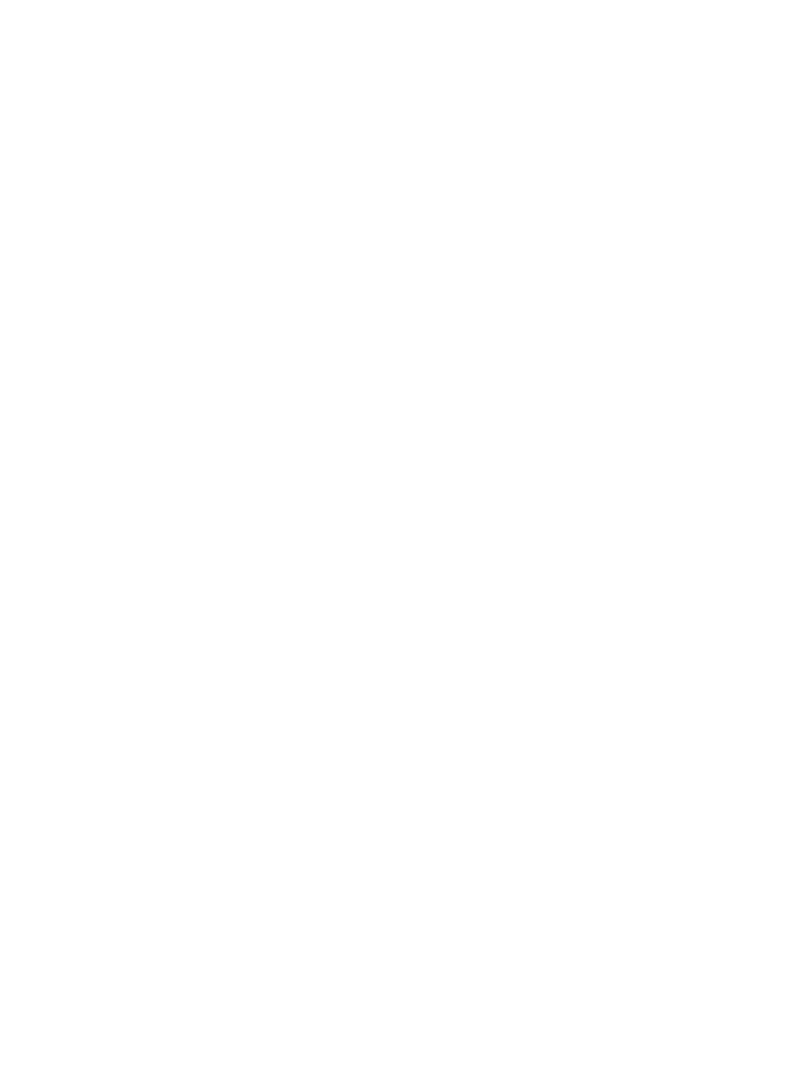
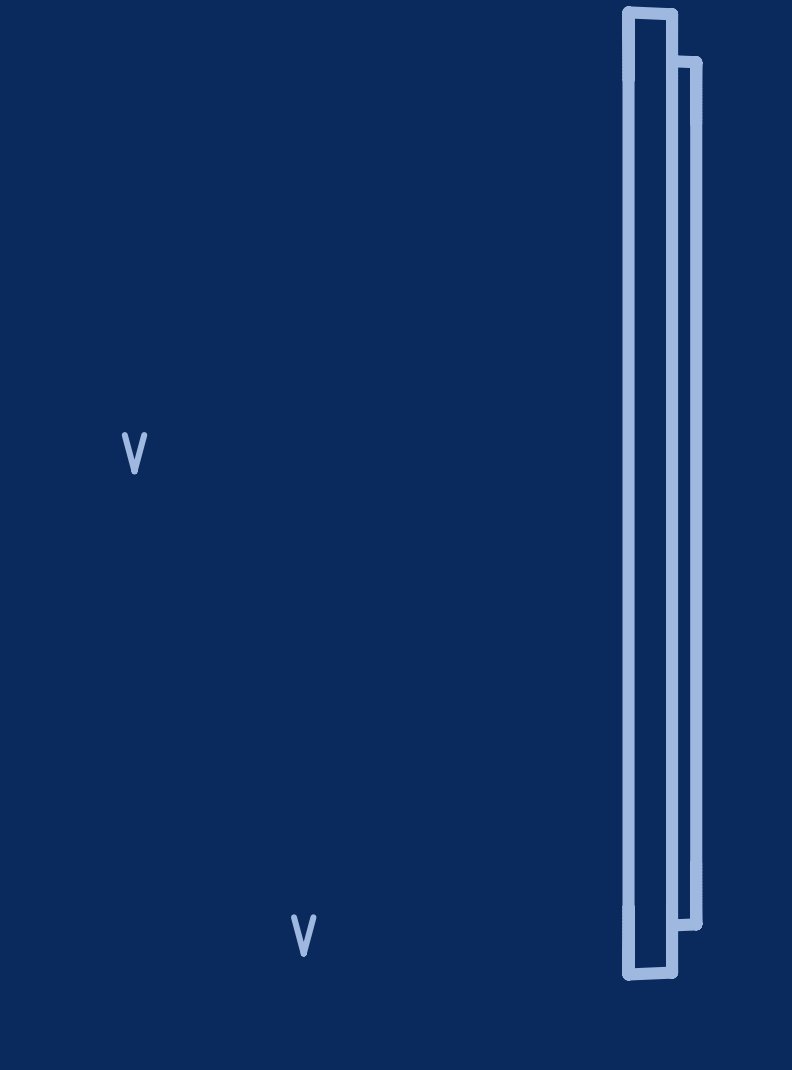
line: none -> (628, 12) (628, 974) (672, 972) (672, 14) (628, 12)
line: none -> (672, 61) (696, 62) (696, 924) (672, 925)
line: none -> (124, 435) (134, 471) (144, 435)
line: none -> (294, 917) (303, 953) (313, 917)

